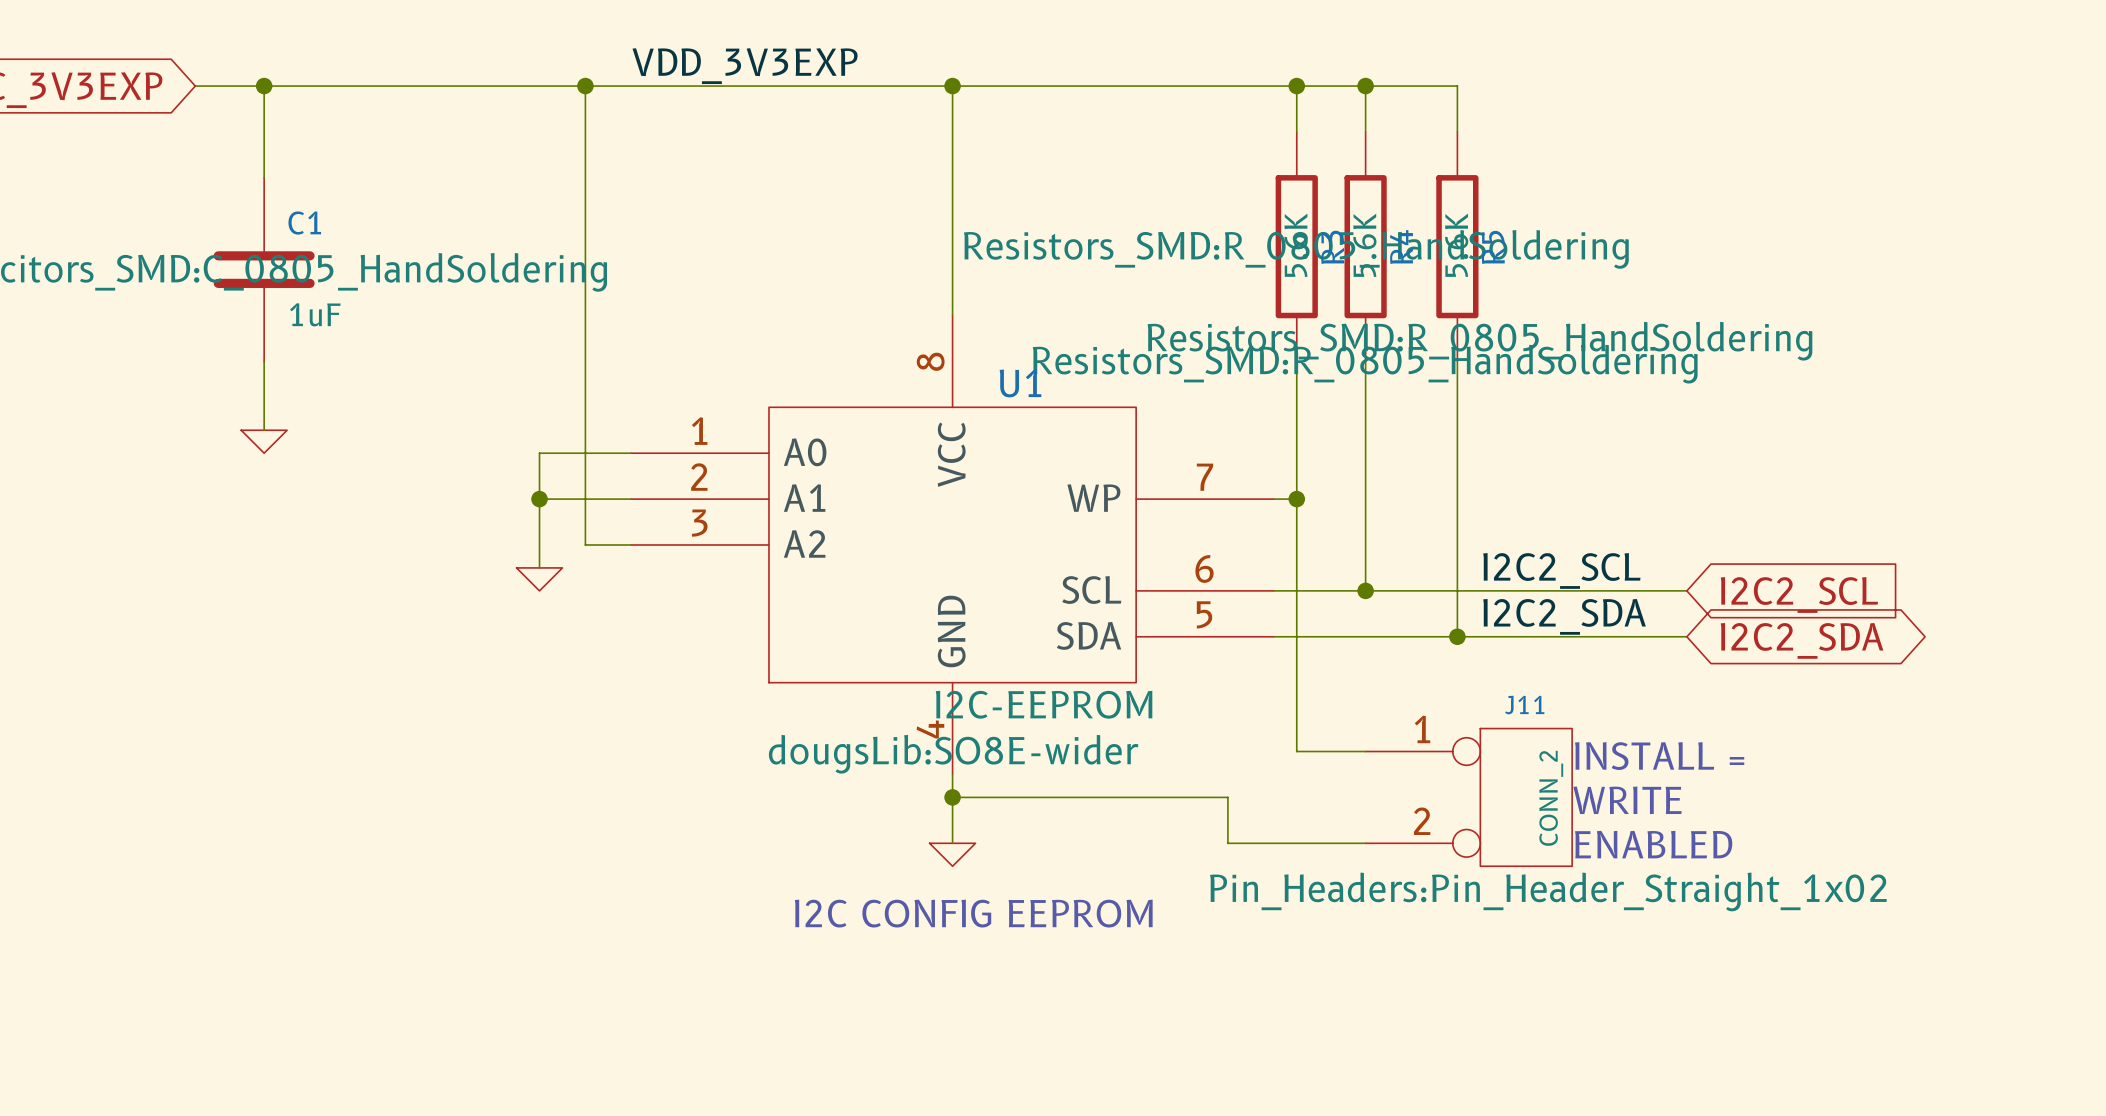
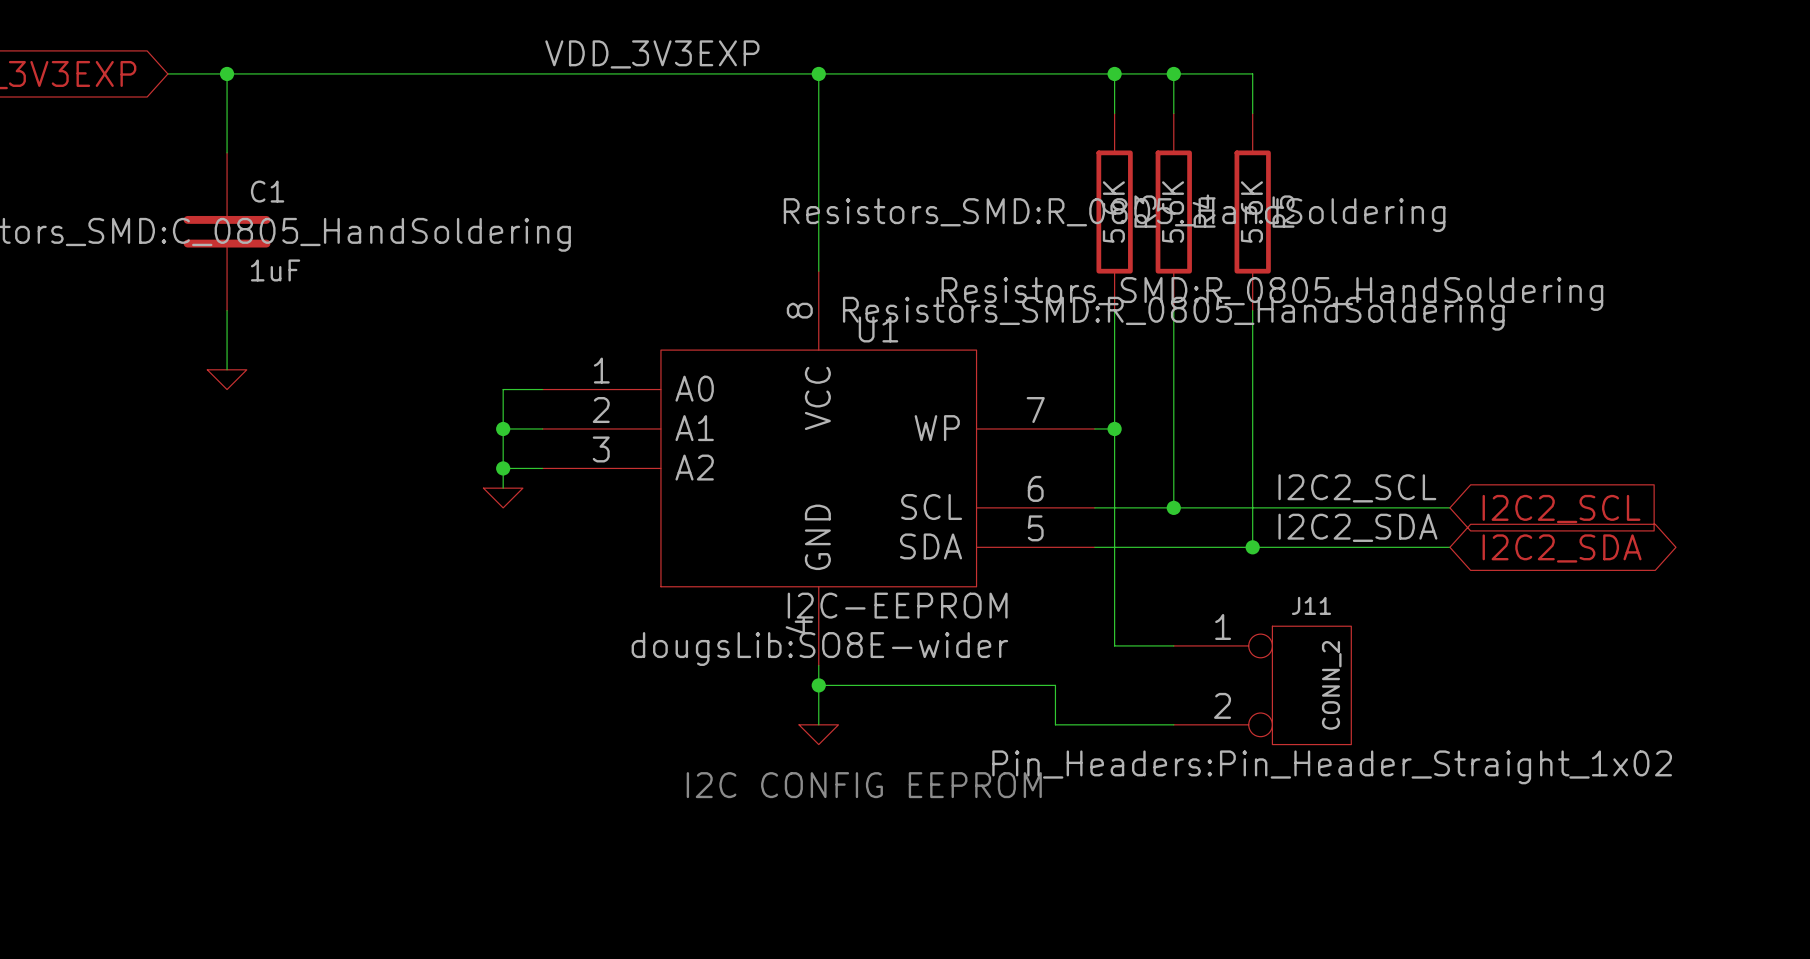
wire: (585, 86) (585, 453) (539, 453) (539, 567) -> none
junction: (585, 86) -> none
wire: (539, 499) (585, 499) -> none
junction: (539, 499) -> none
junction: none -> (503, 428)
wire: none -> (503, 468) (503, 488)
junction: none -> (503, 468)
power symbol position: (539, 579) -> (503, 498)
text: INSTALL = (1659, 756) -> none
text: WRITE (1627, 800) -> none
text: ENABLED (1653, 844) -> none

